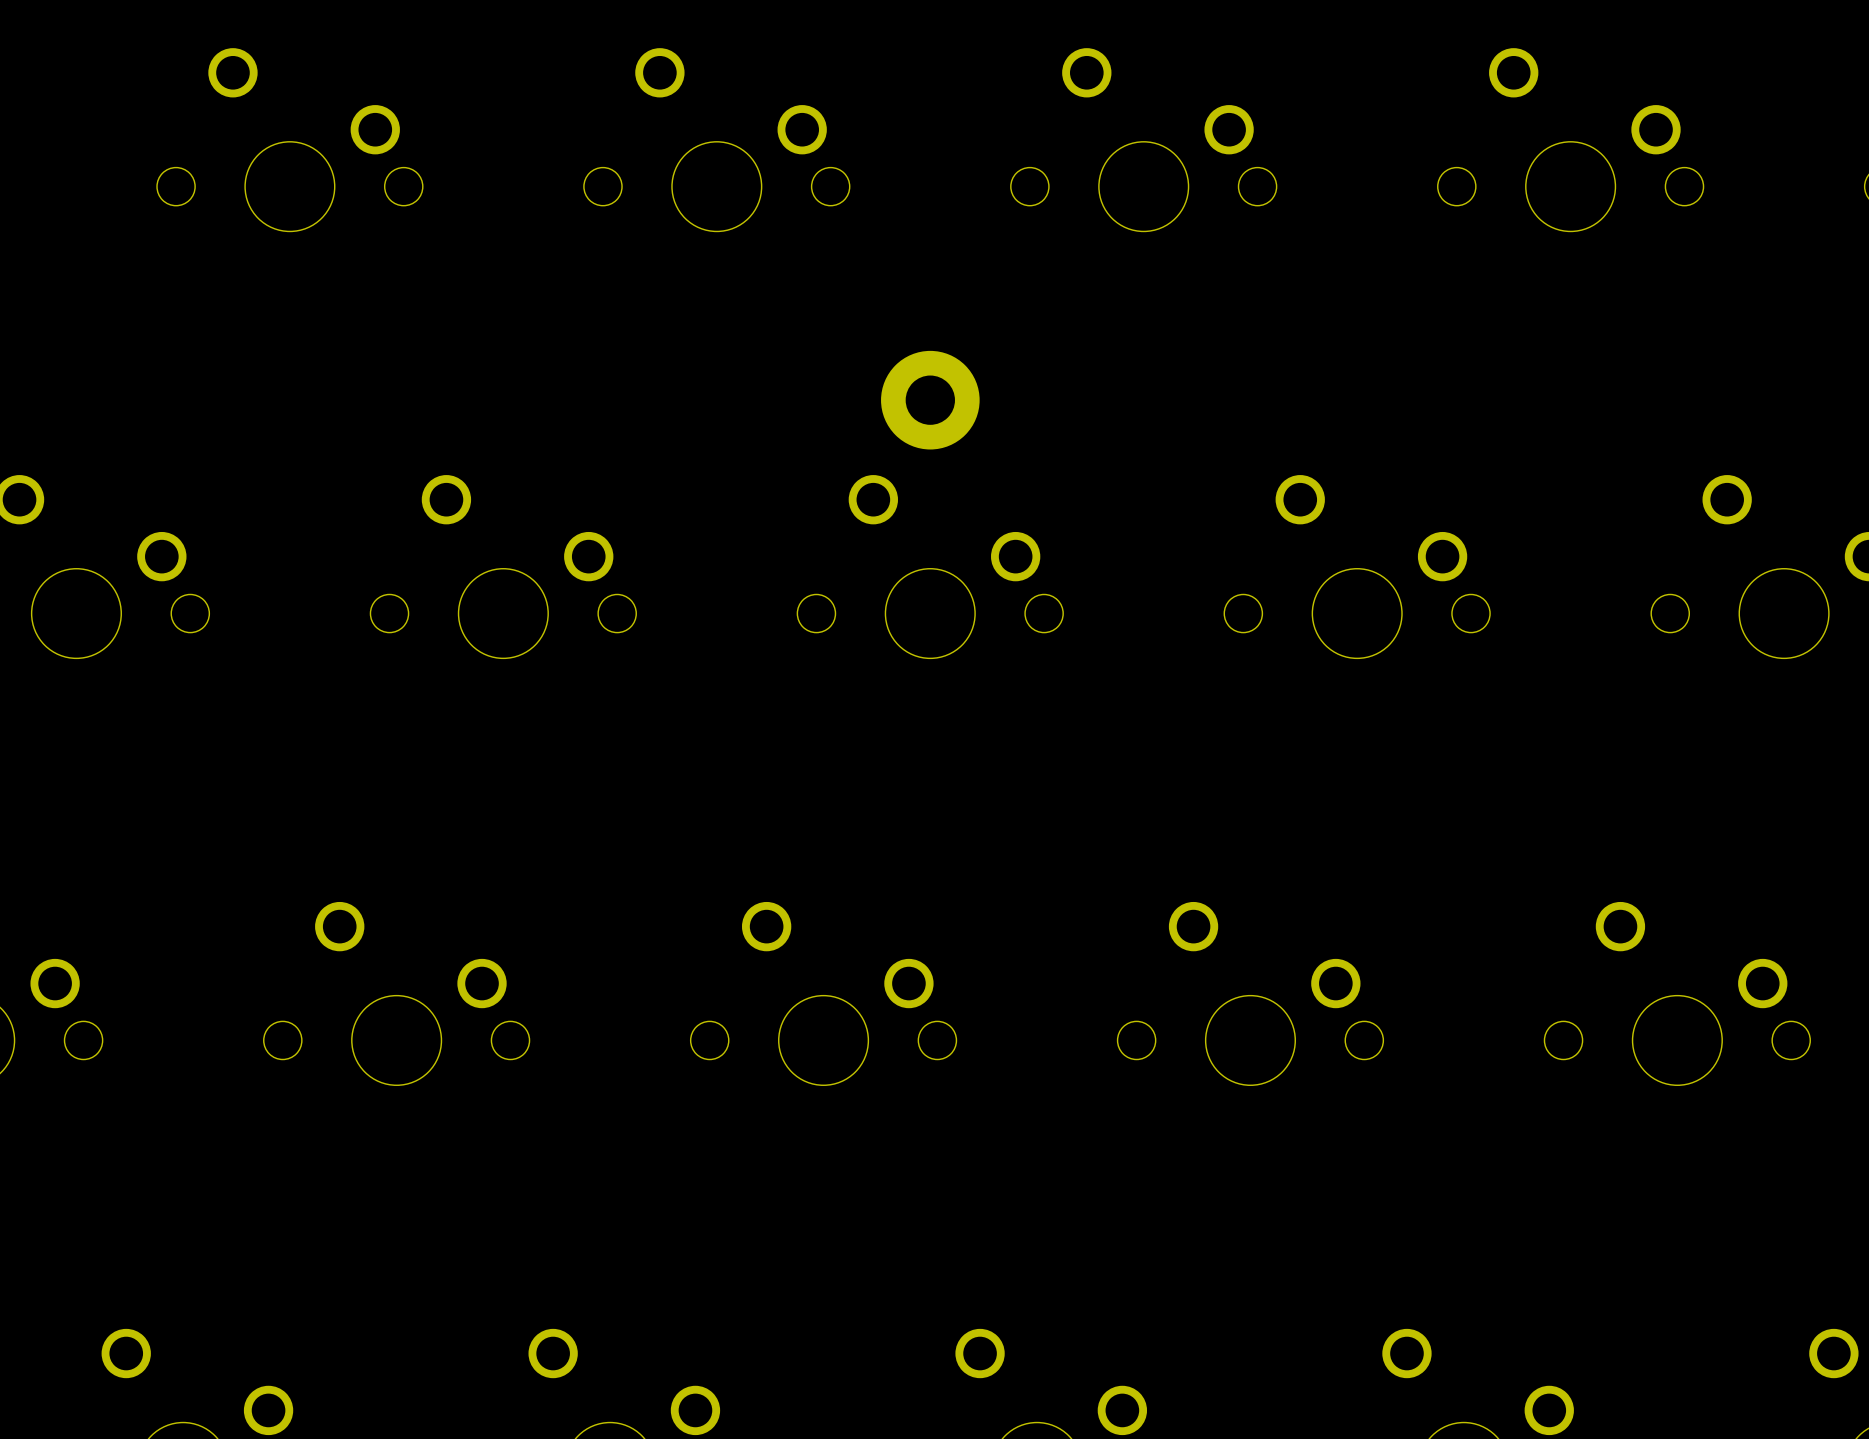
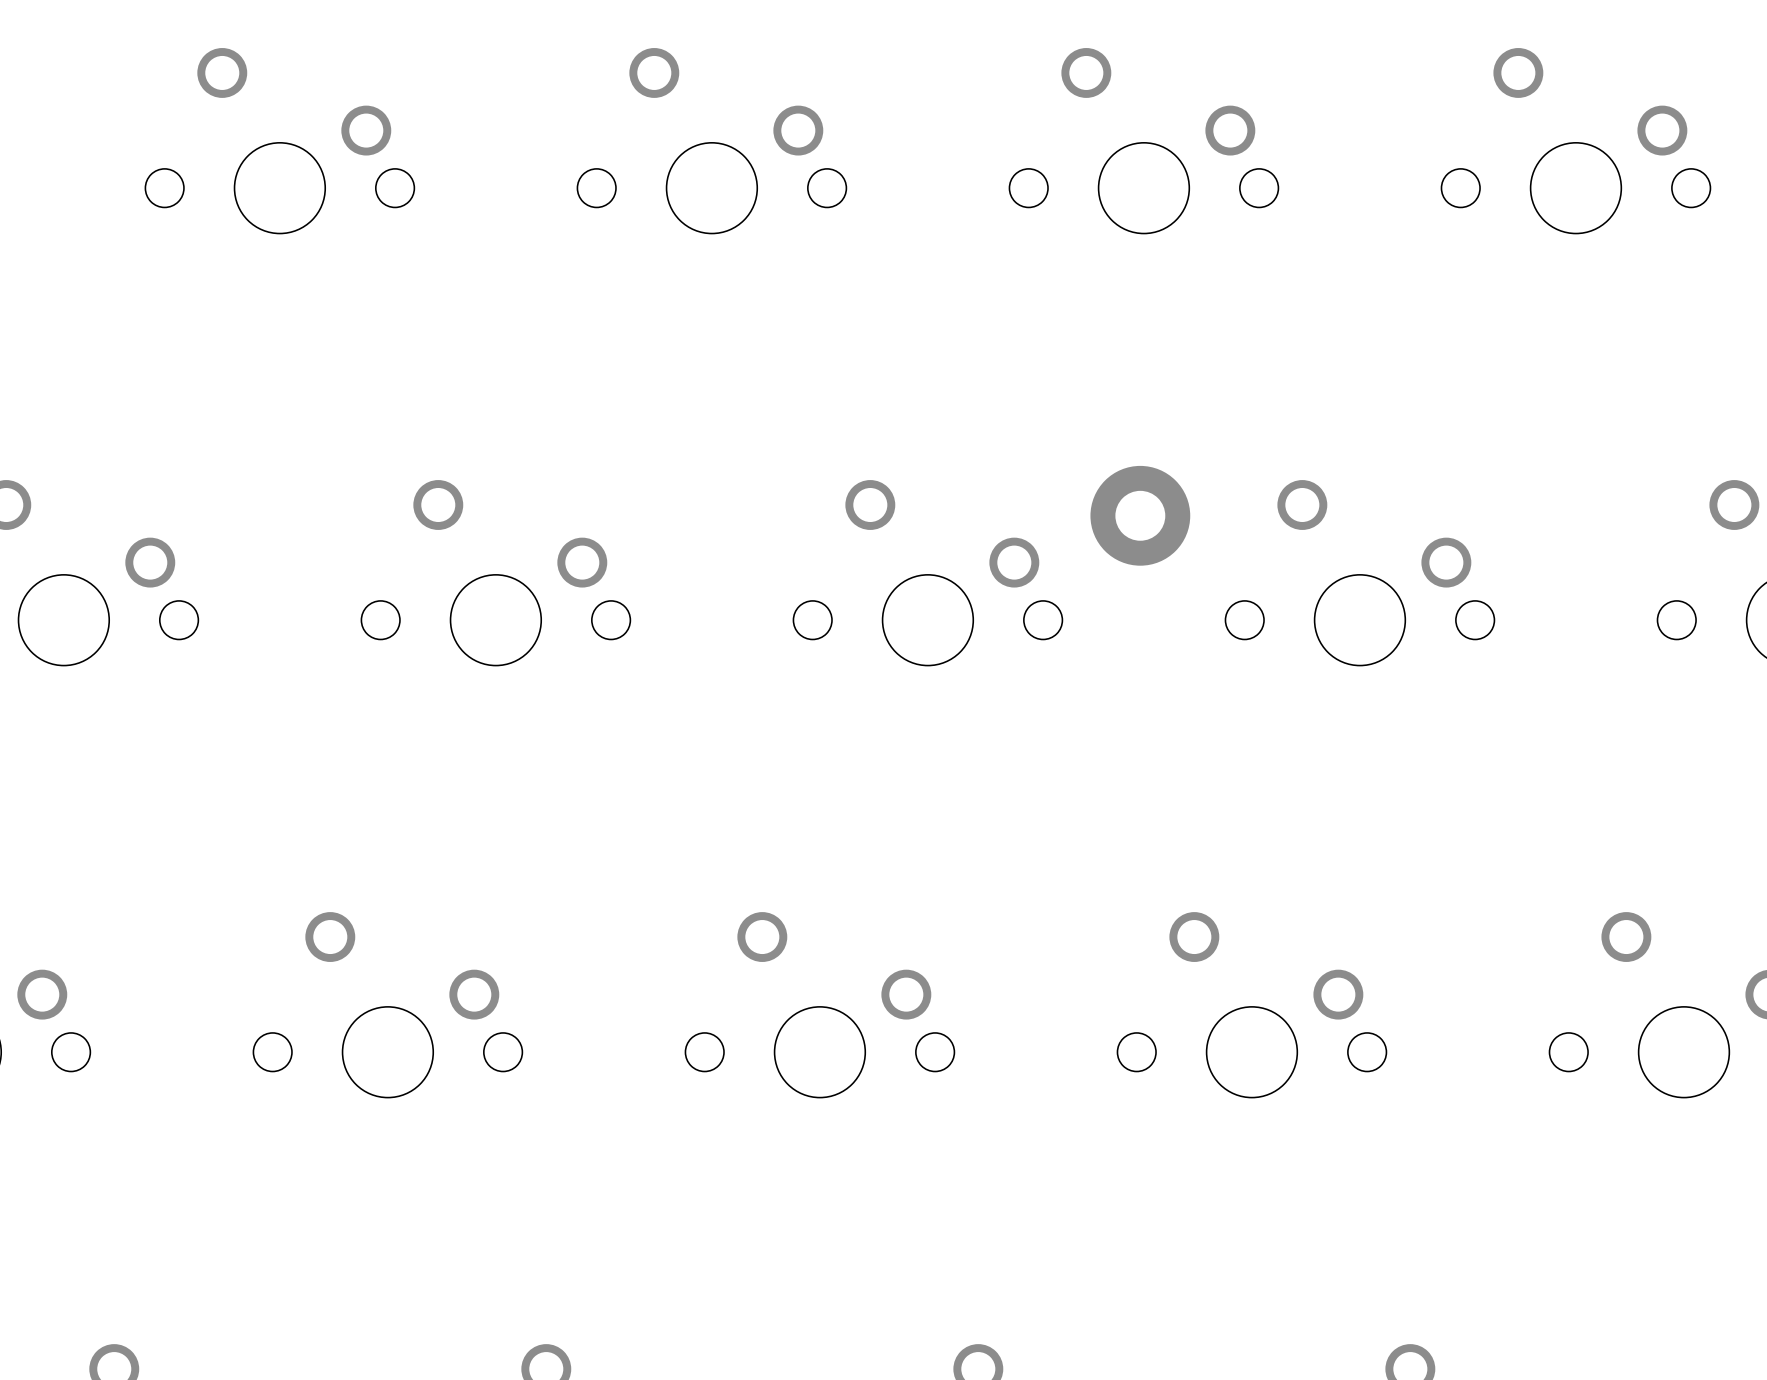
part position: (930, 400) -> (1140, 515)

